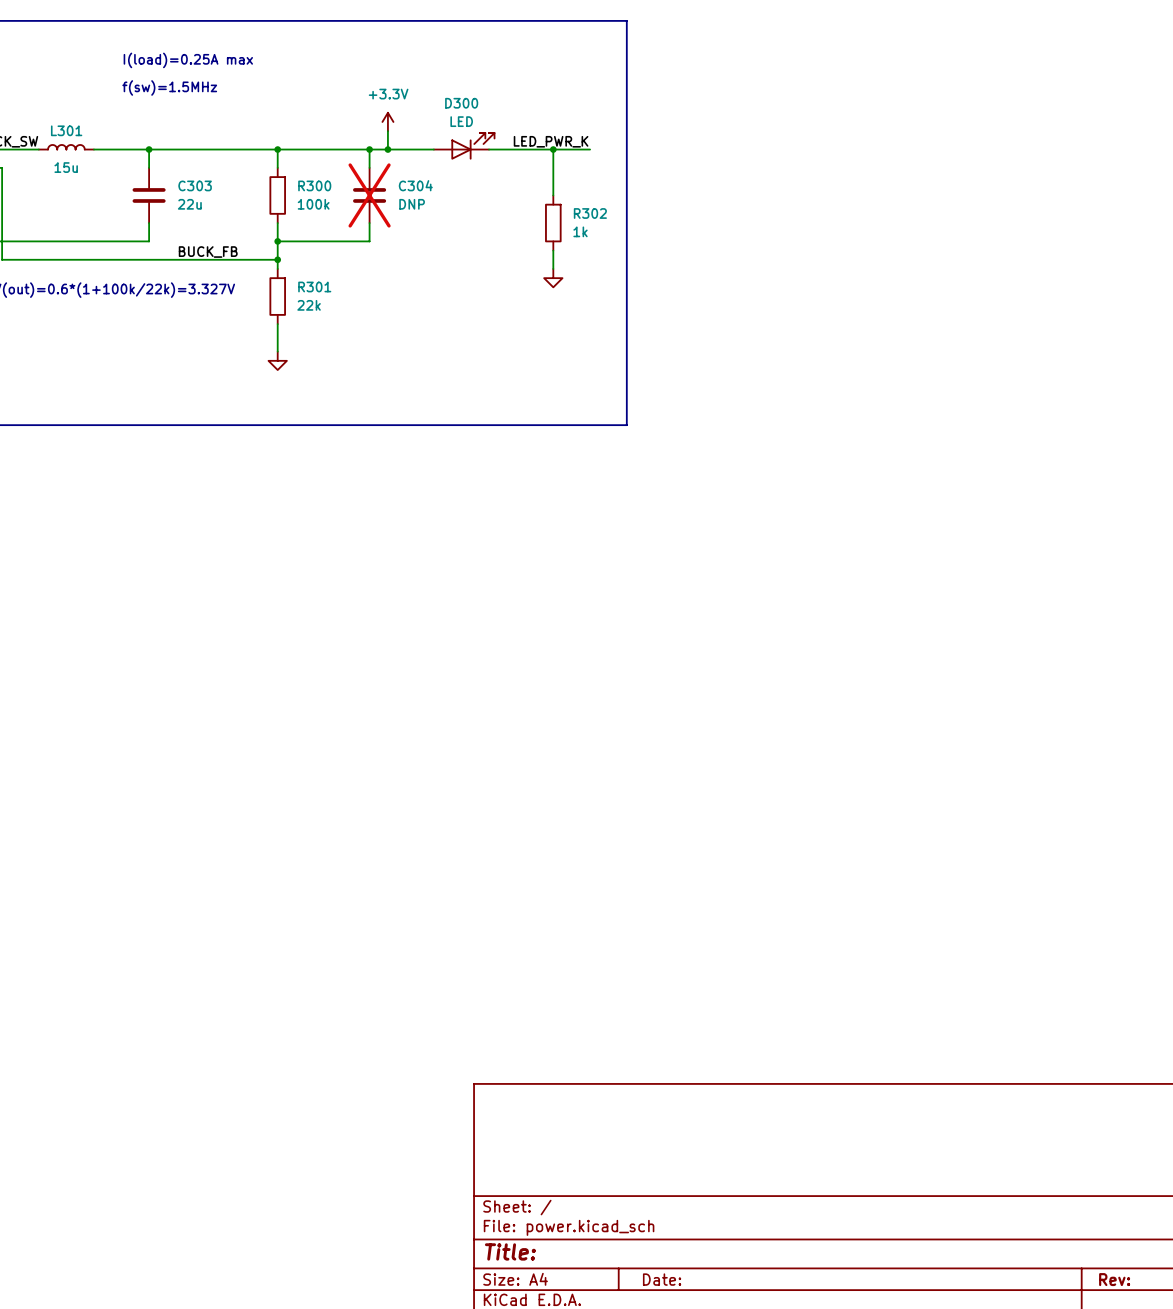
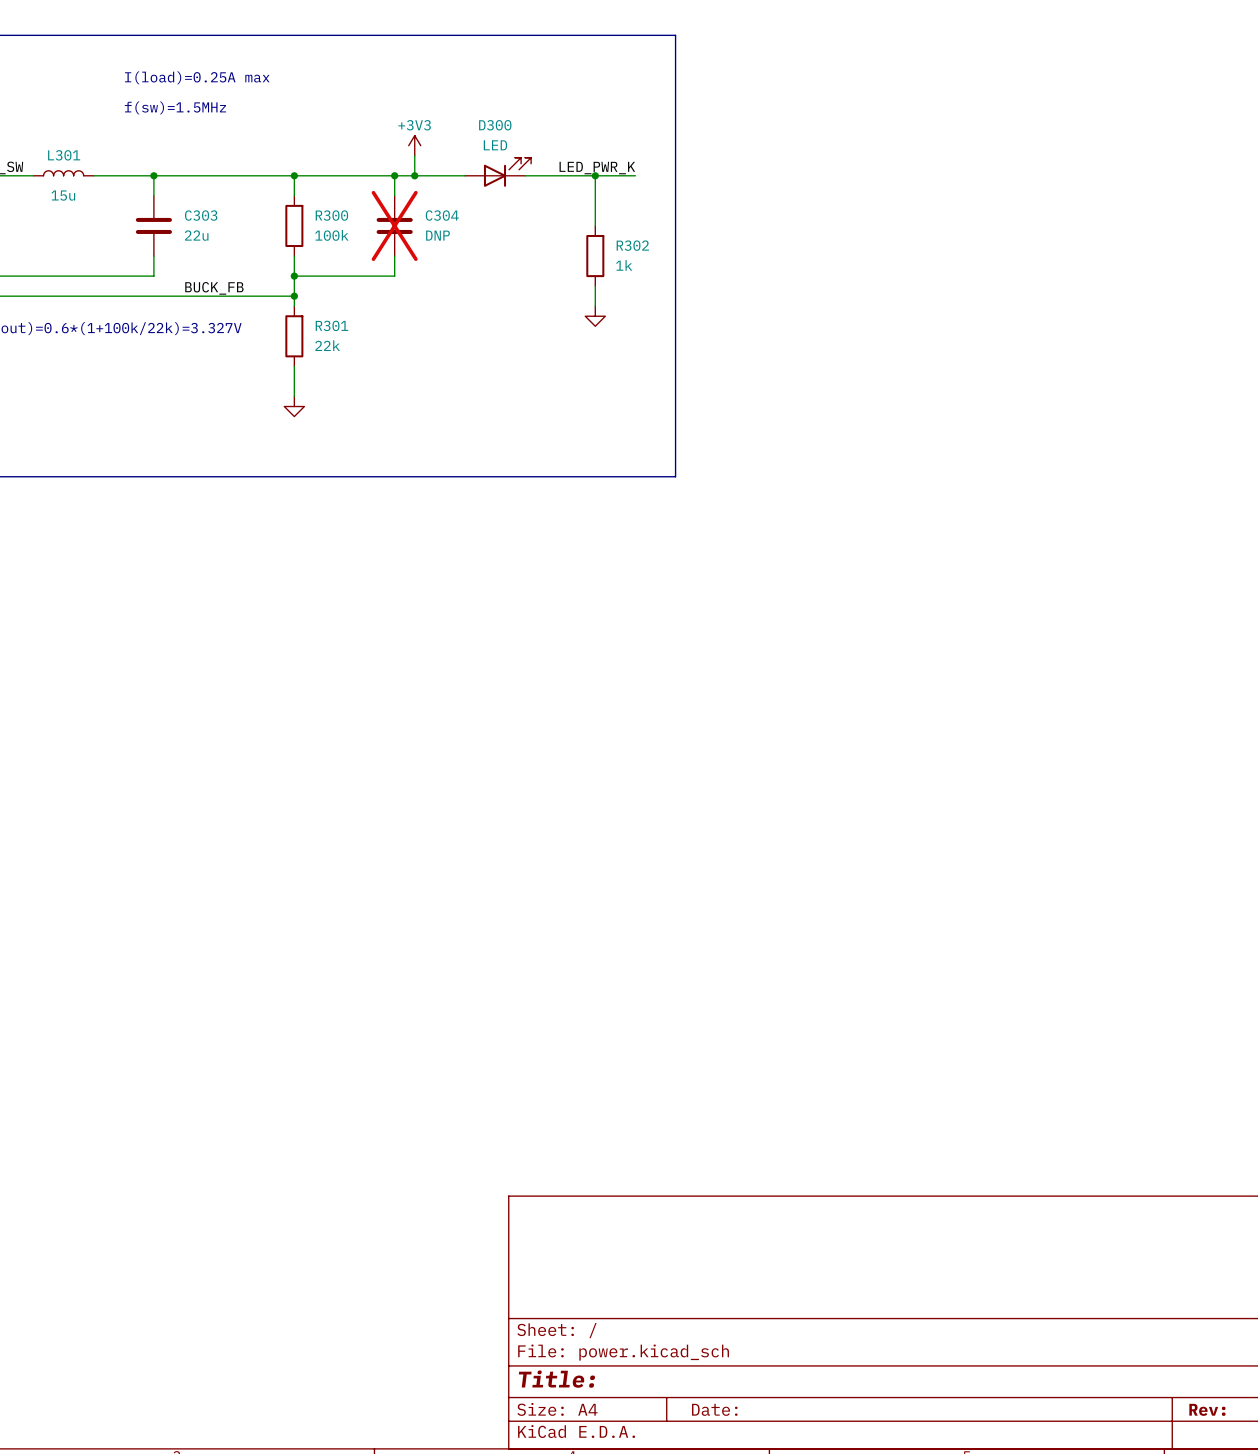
power symbol: +3.3V (387, 121) -> +3V3 (414, 145)

